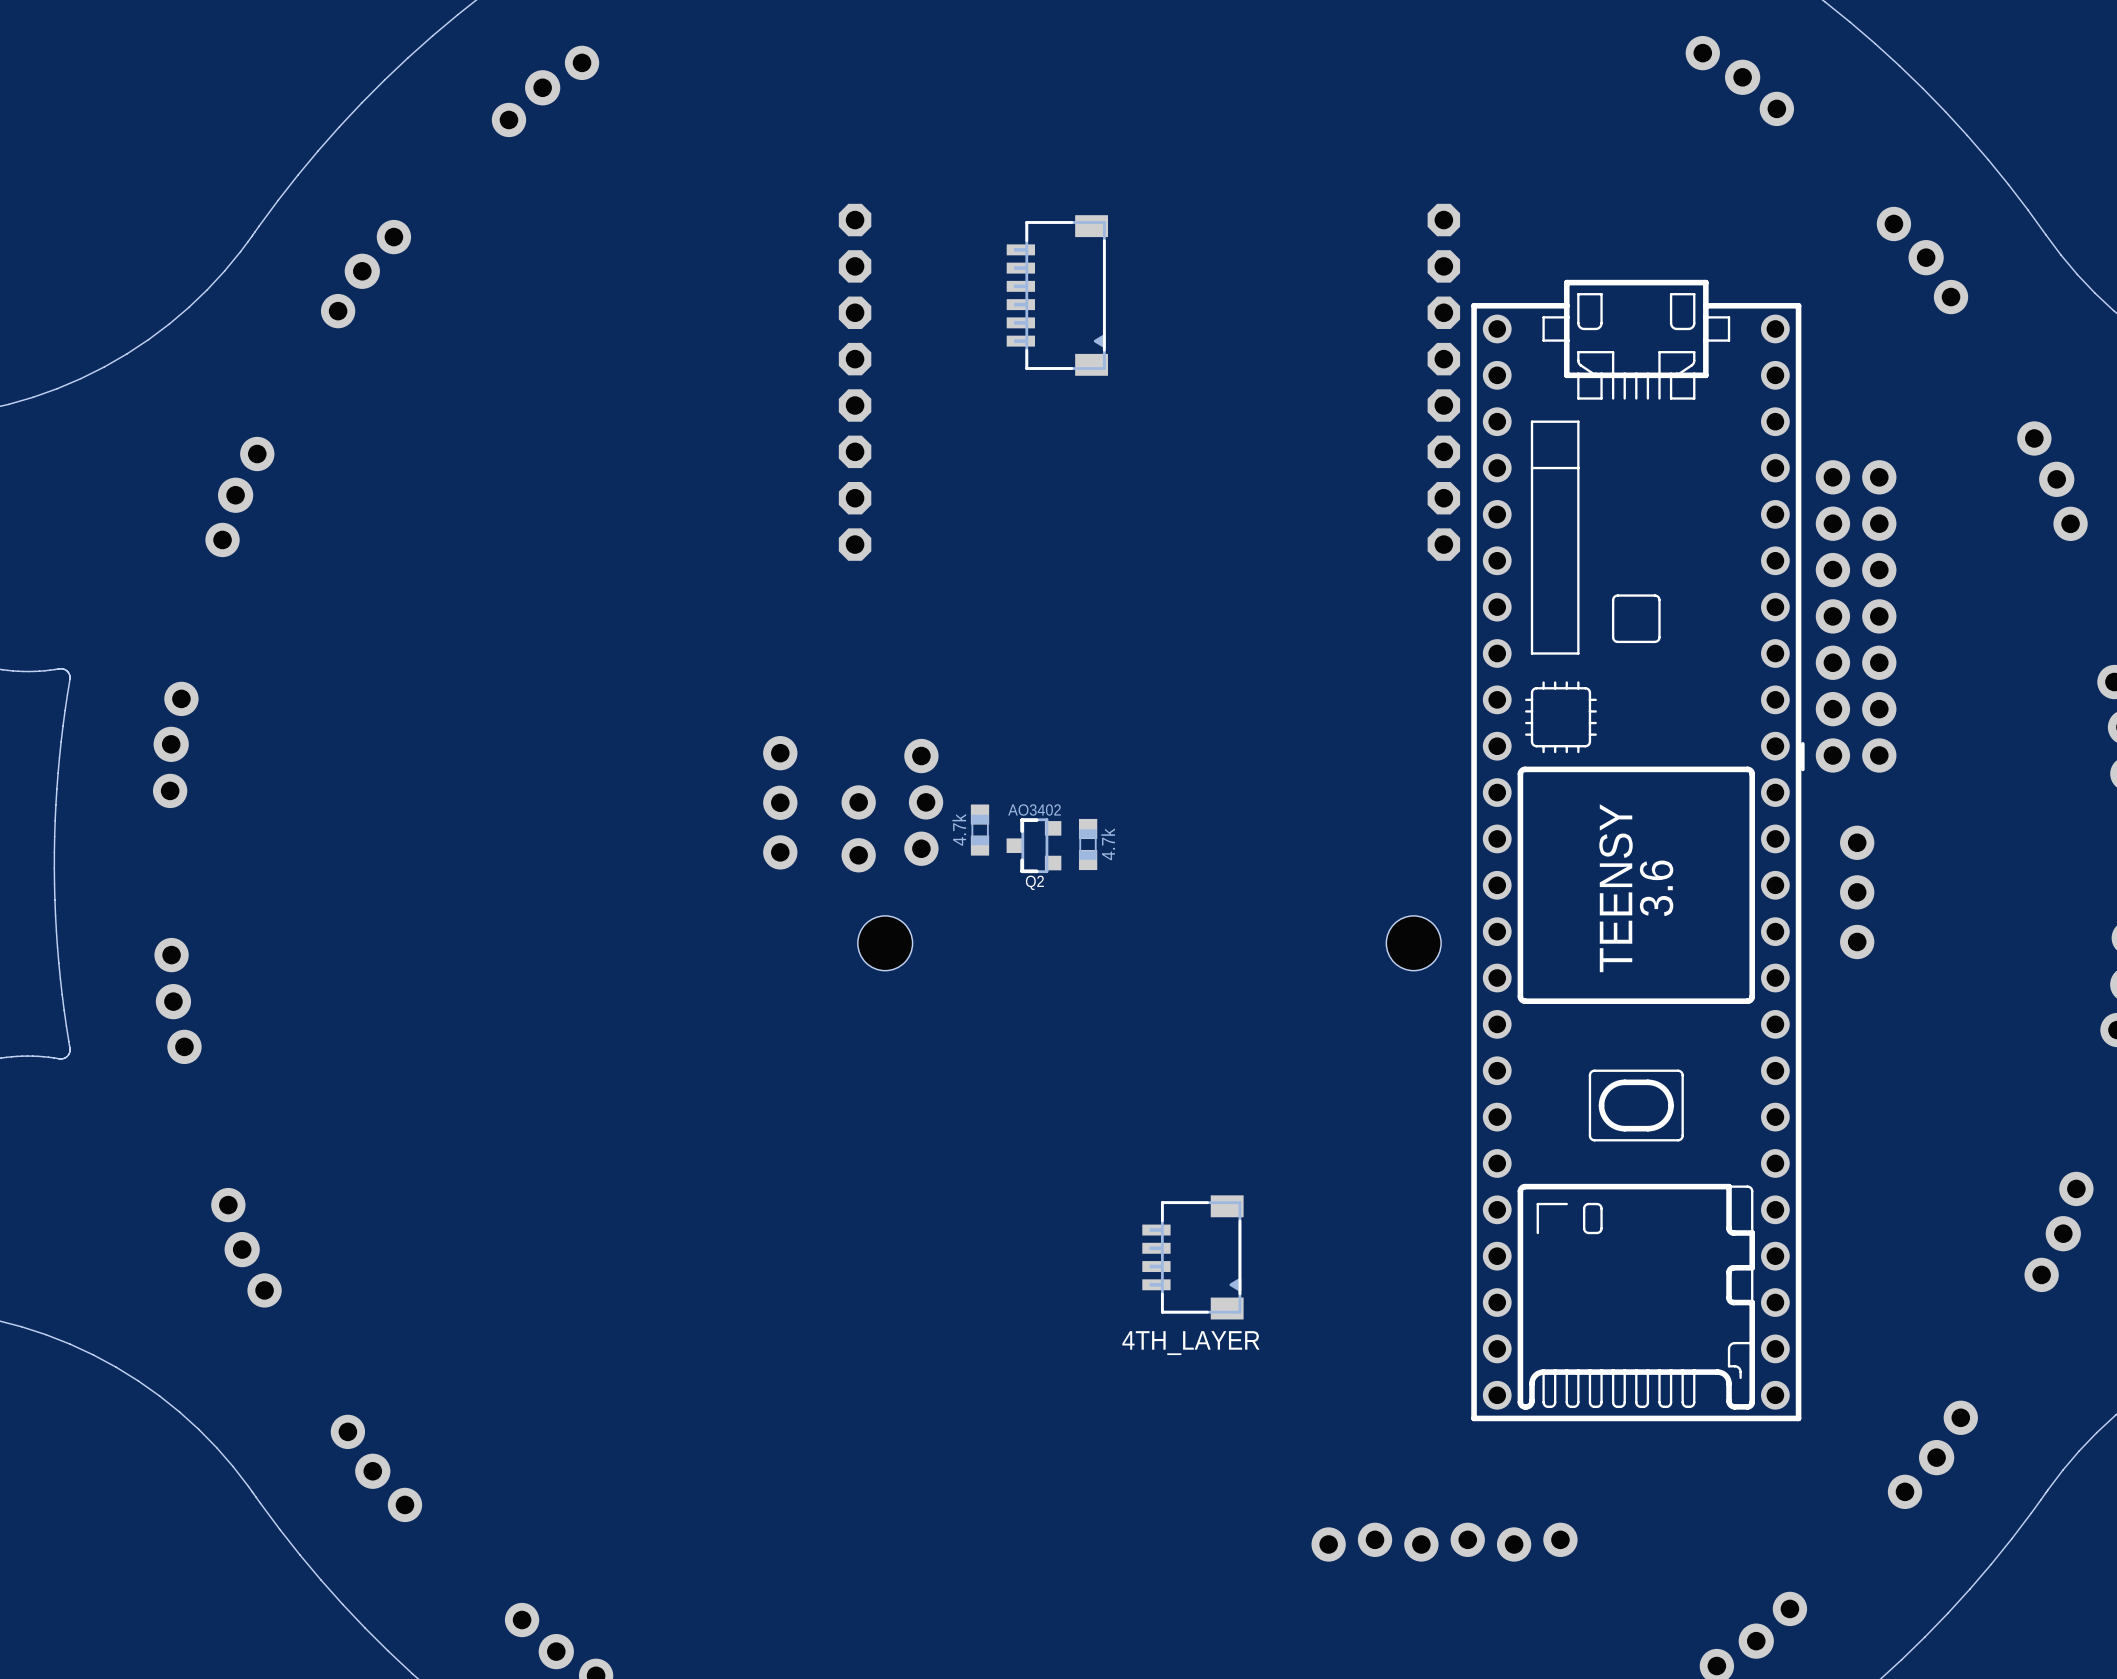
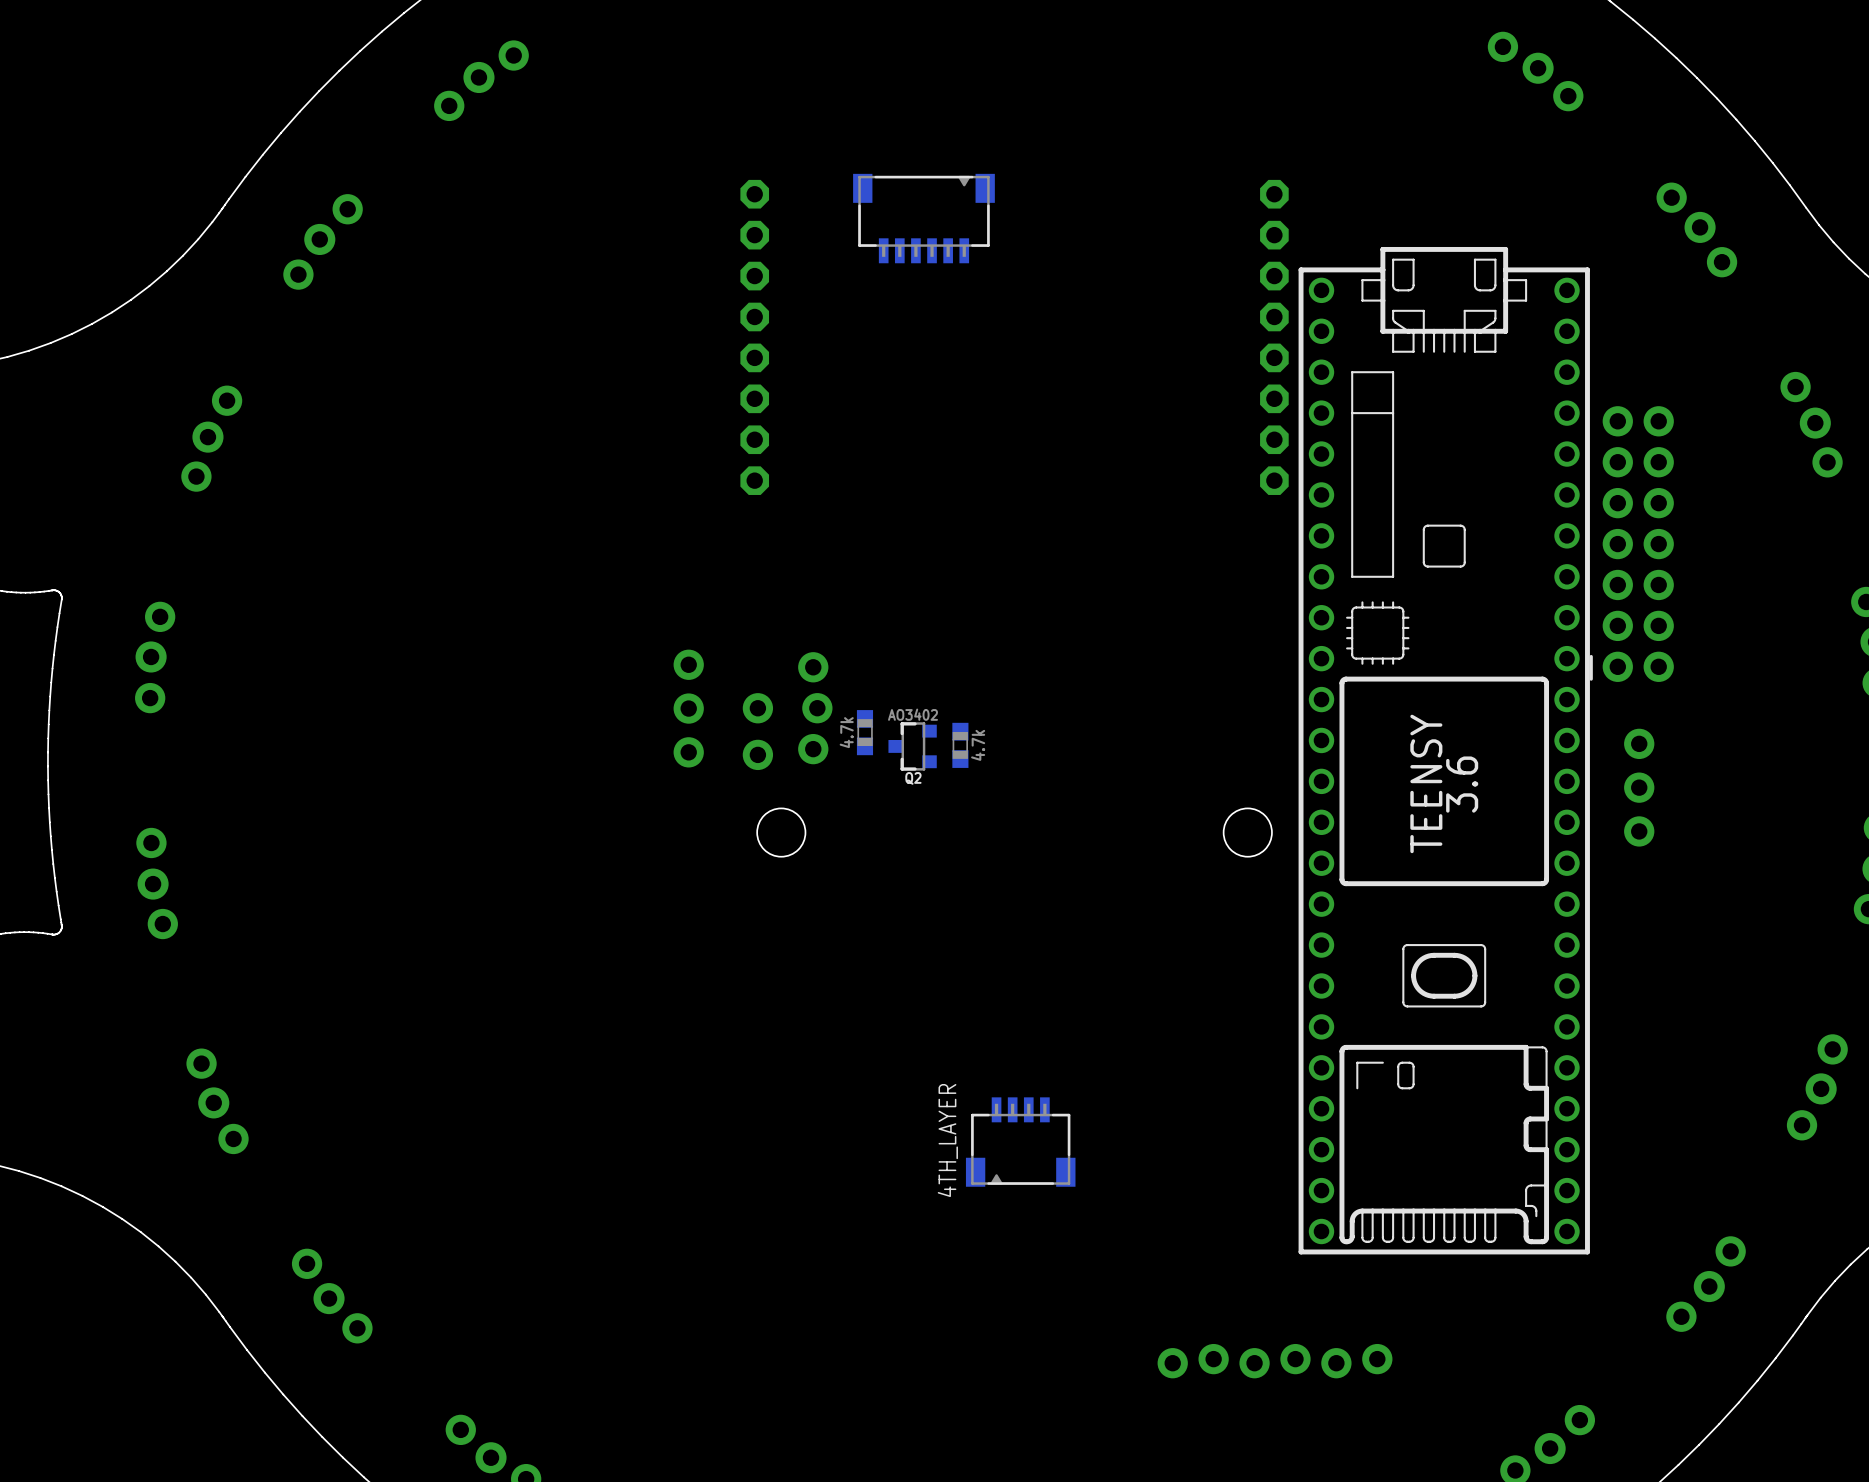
part rotation: 0° (1057, 295) -> 90° counterclockwise (923, 218)
4TH_LAYER rotation: 0° (1192, 1257) -> 90° clockwise (1020, 1142)

